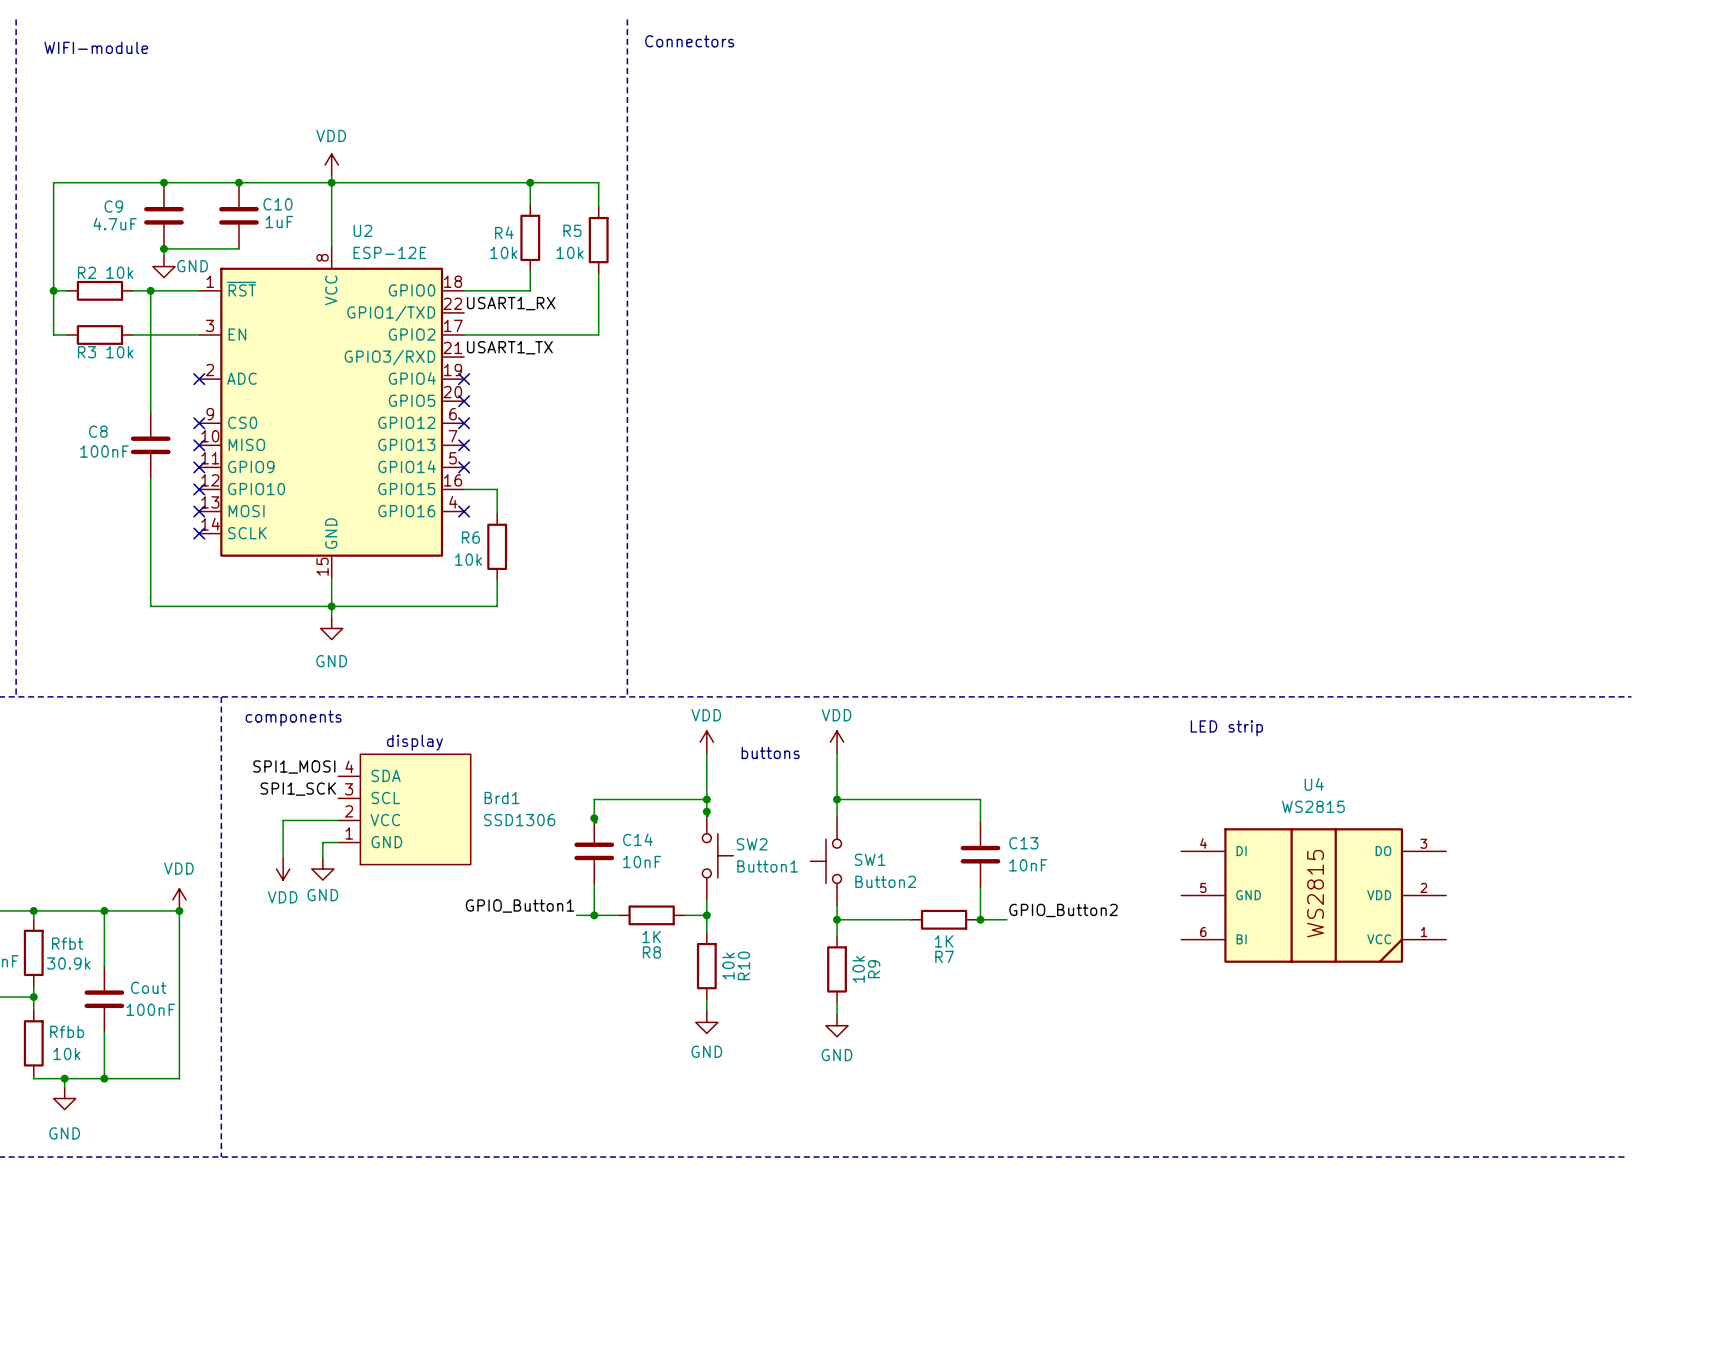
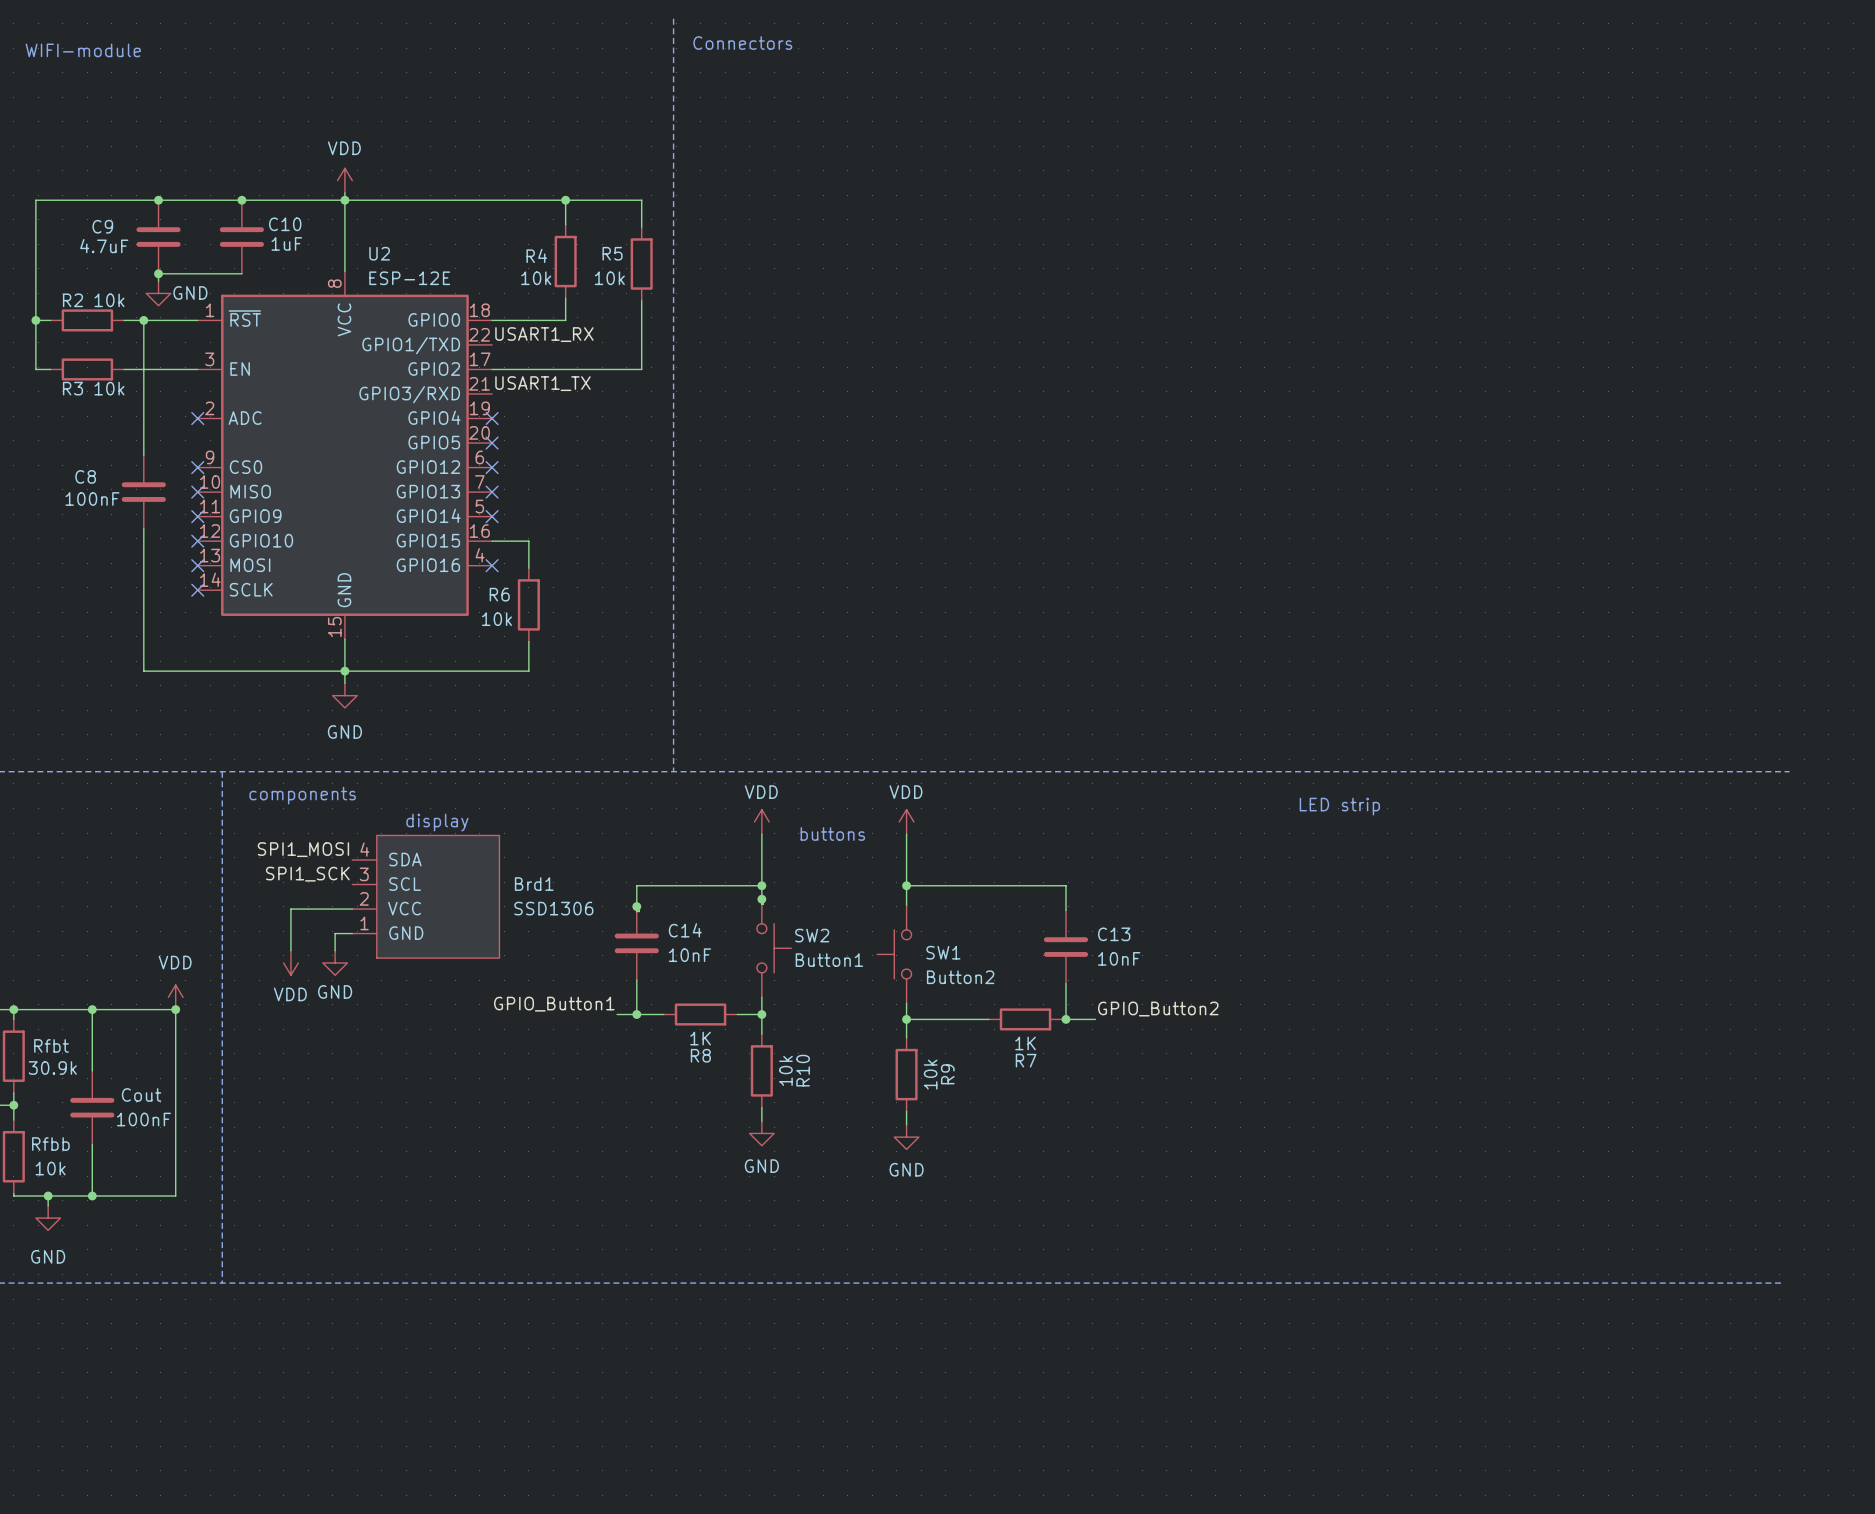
U4: WS2815 (1313, 895) -> none

